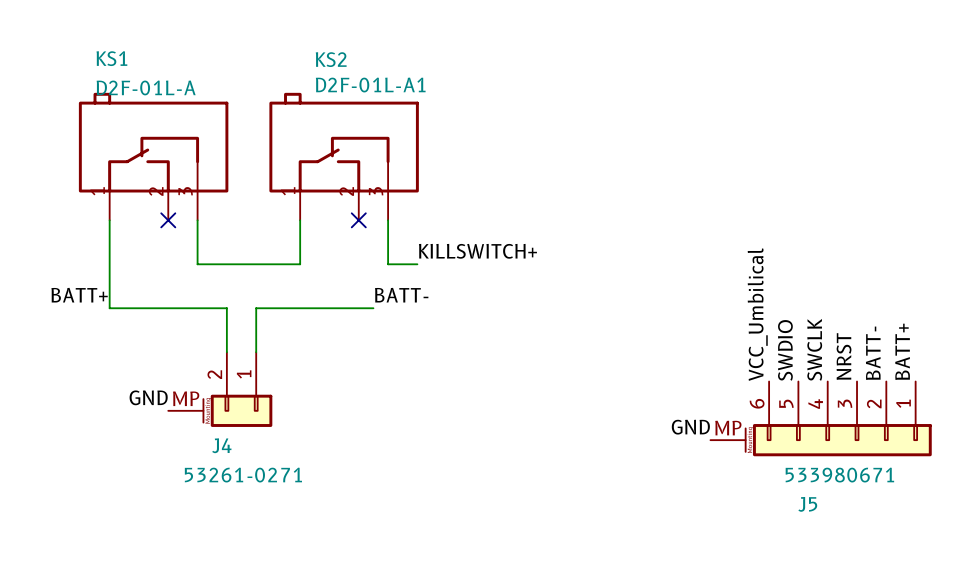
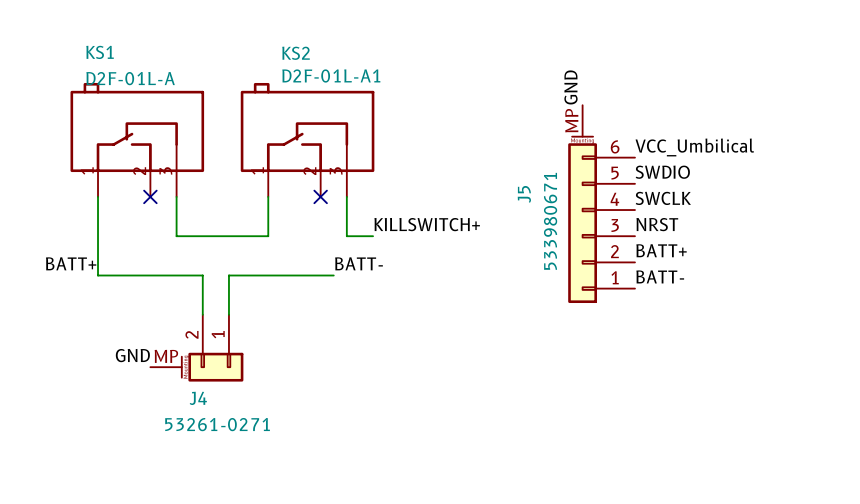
label: none -> GND (570, 87)
label rotation: 0° (757, 314) -> 90° clockwise (694, 147)
label rotation: 0° (814, 349) -> 90° clockwise (663, 198)
label position: SWCLK (814, 349) -> SWCLK (663, 198)
label rotation: 0° (785, 350) -> 90° clockwise (662, 172)
label position: SWDIO (785, 350) -> SWDIO (662, 172)
label rotation: 0° (902, 351) -> 90° clockwise (661, 250)
label position: BATT+ (902, 351) -> BATT+ (661, 250)
label rotation: 0° (873, 353) -> 90° clockwise (660, 276)
label position: BATT- (873, 353) -> BATT- (660, 276)
label rotation: 0° (844, 356) -> 90° clockwise (657, 224)
label position: NRST (844, 356) -> NRST (657, 224)
J5 position: (821, 418) -> (601, 204)
label: GND (690, 427) -> none
J5 rotation: 0° (838, 440) -> 90° clockwise (582, 219)

